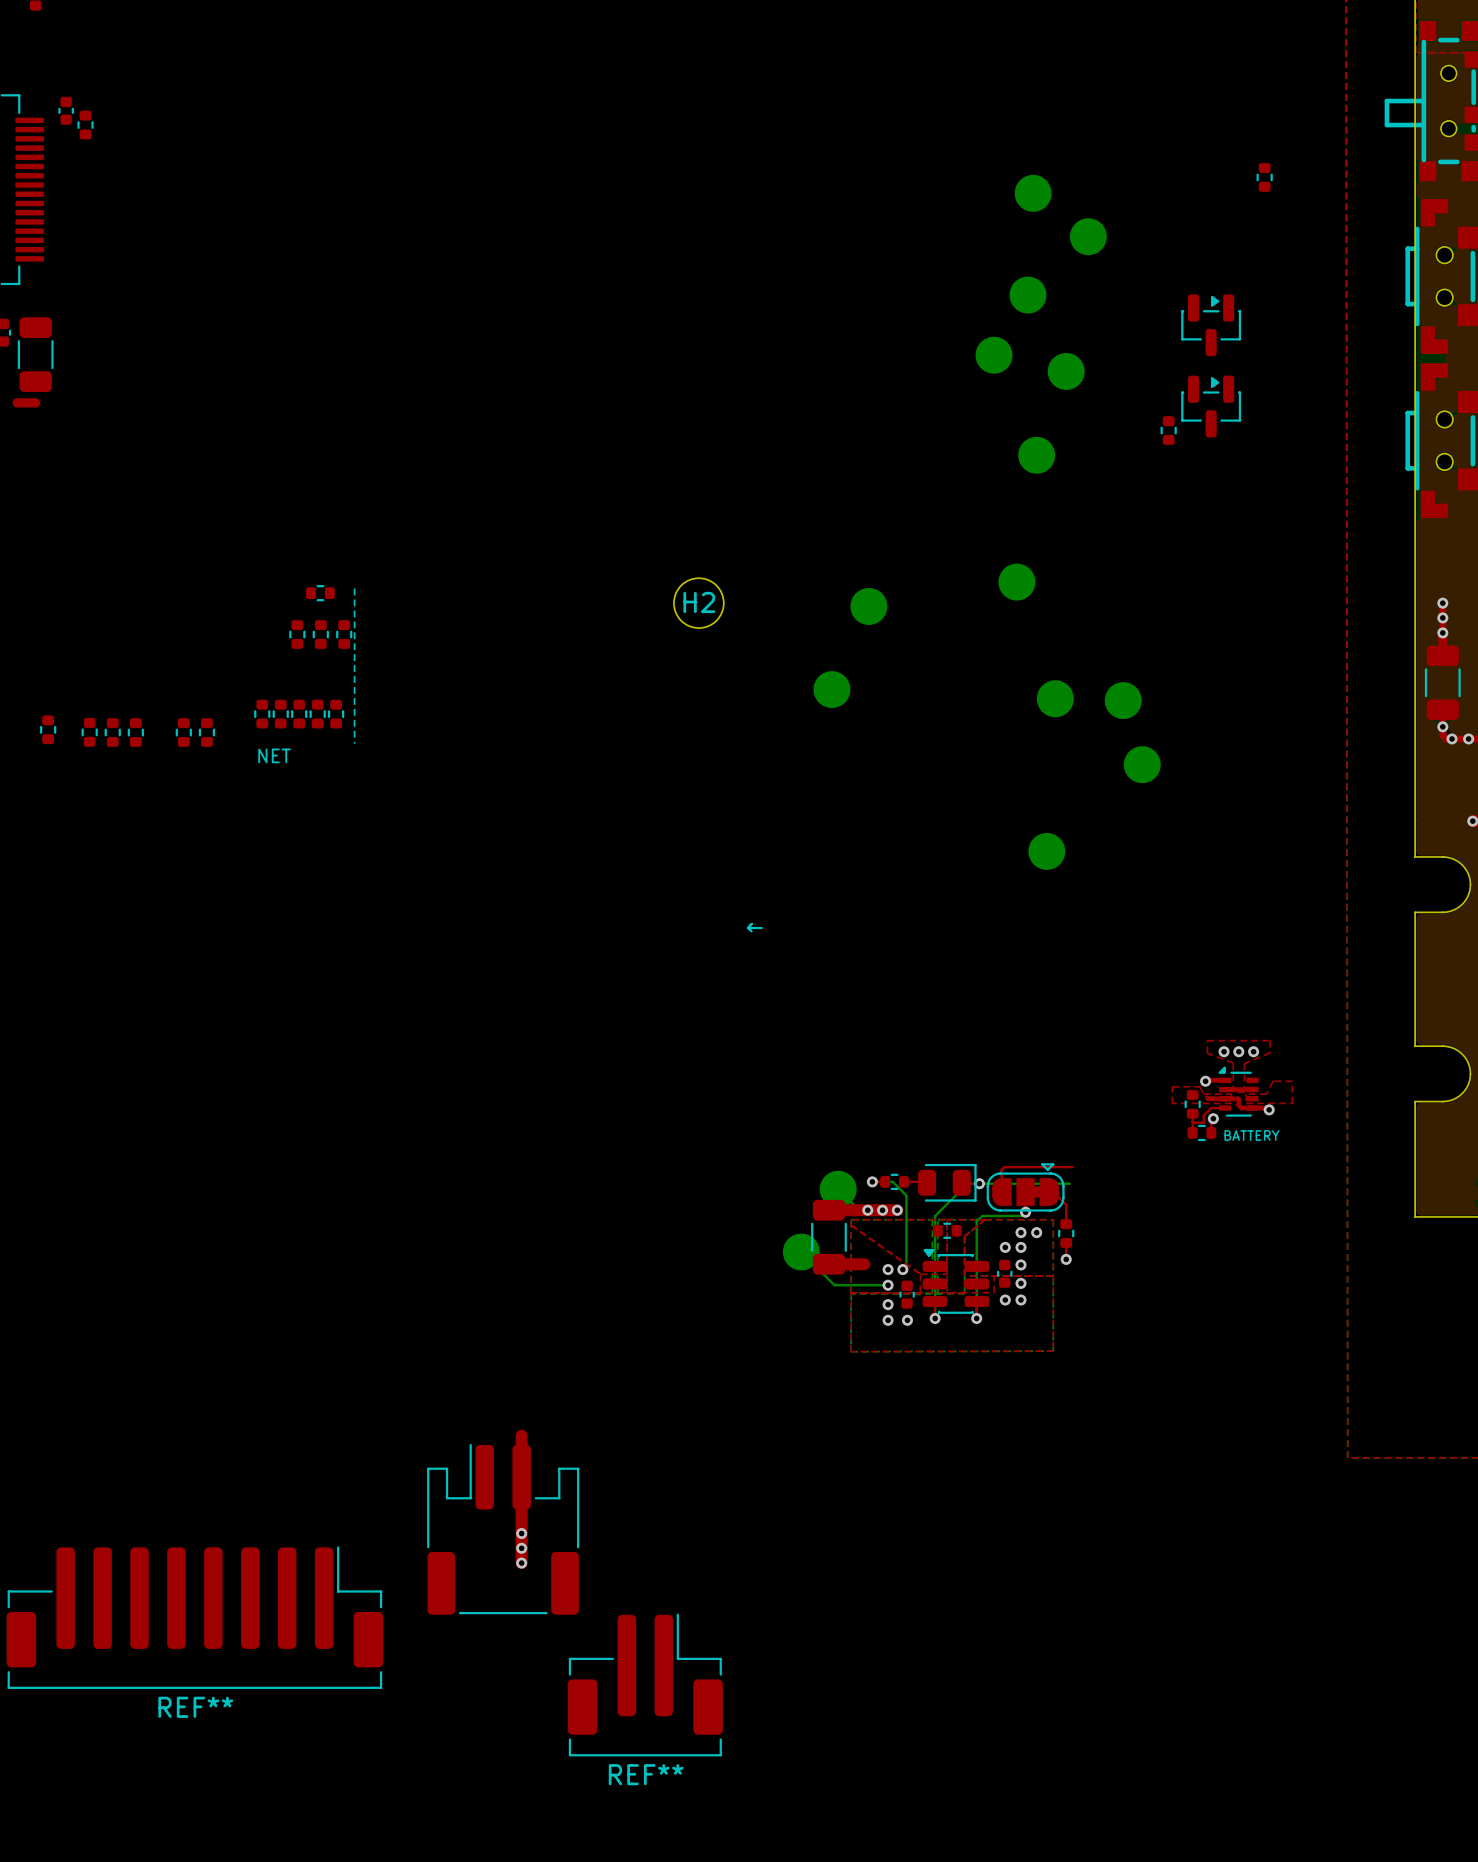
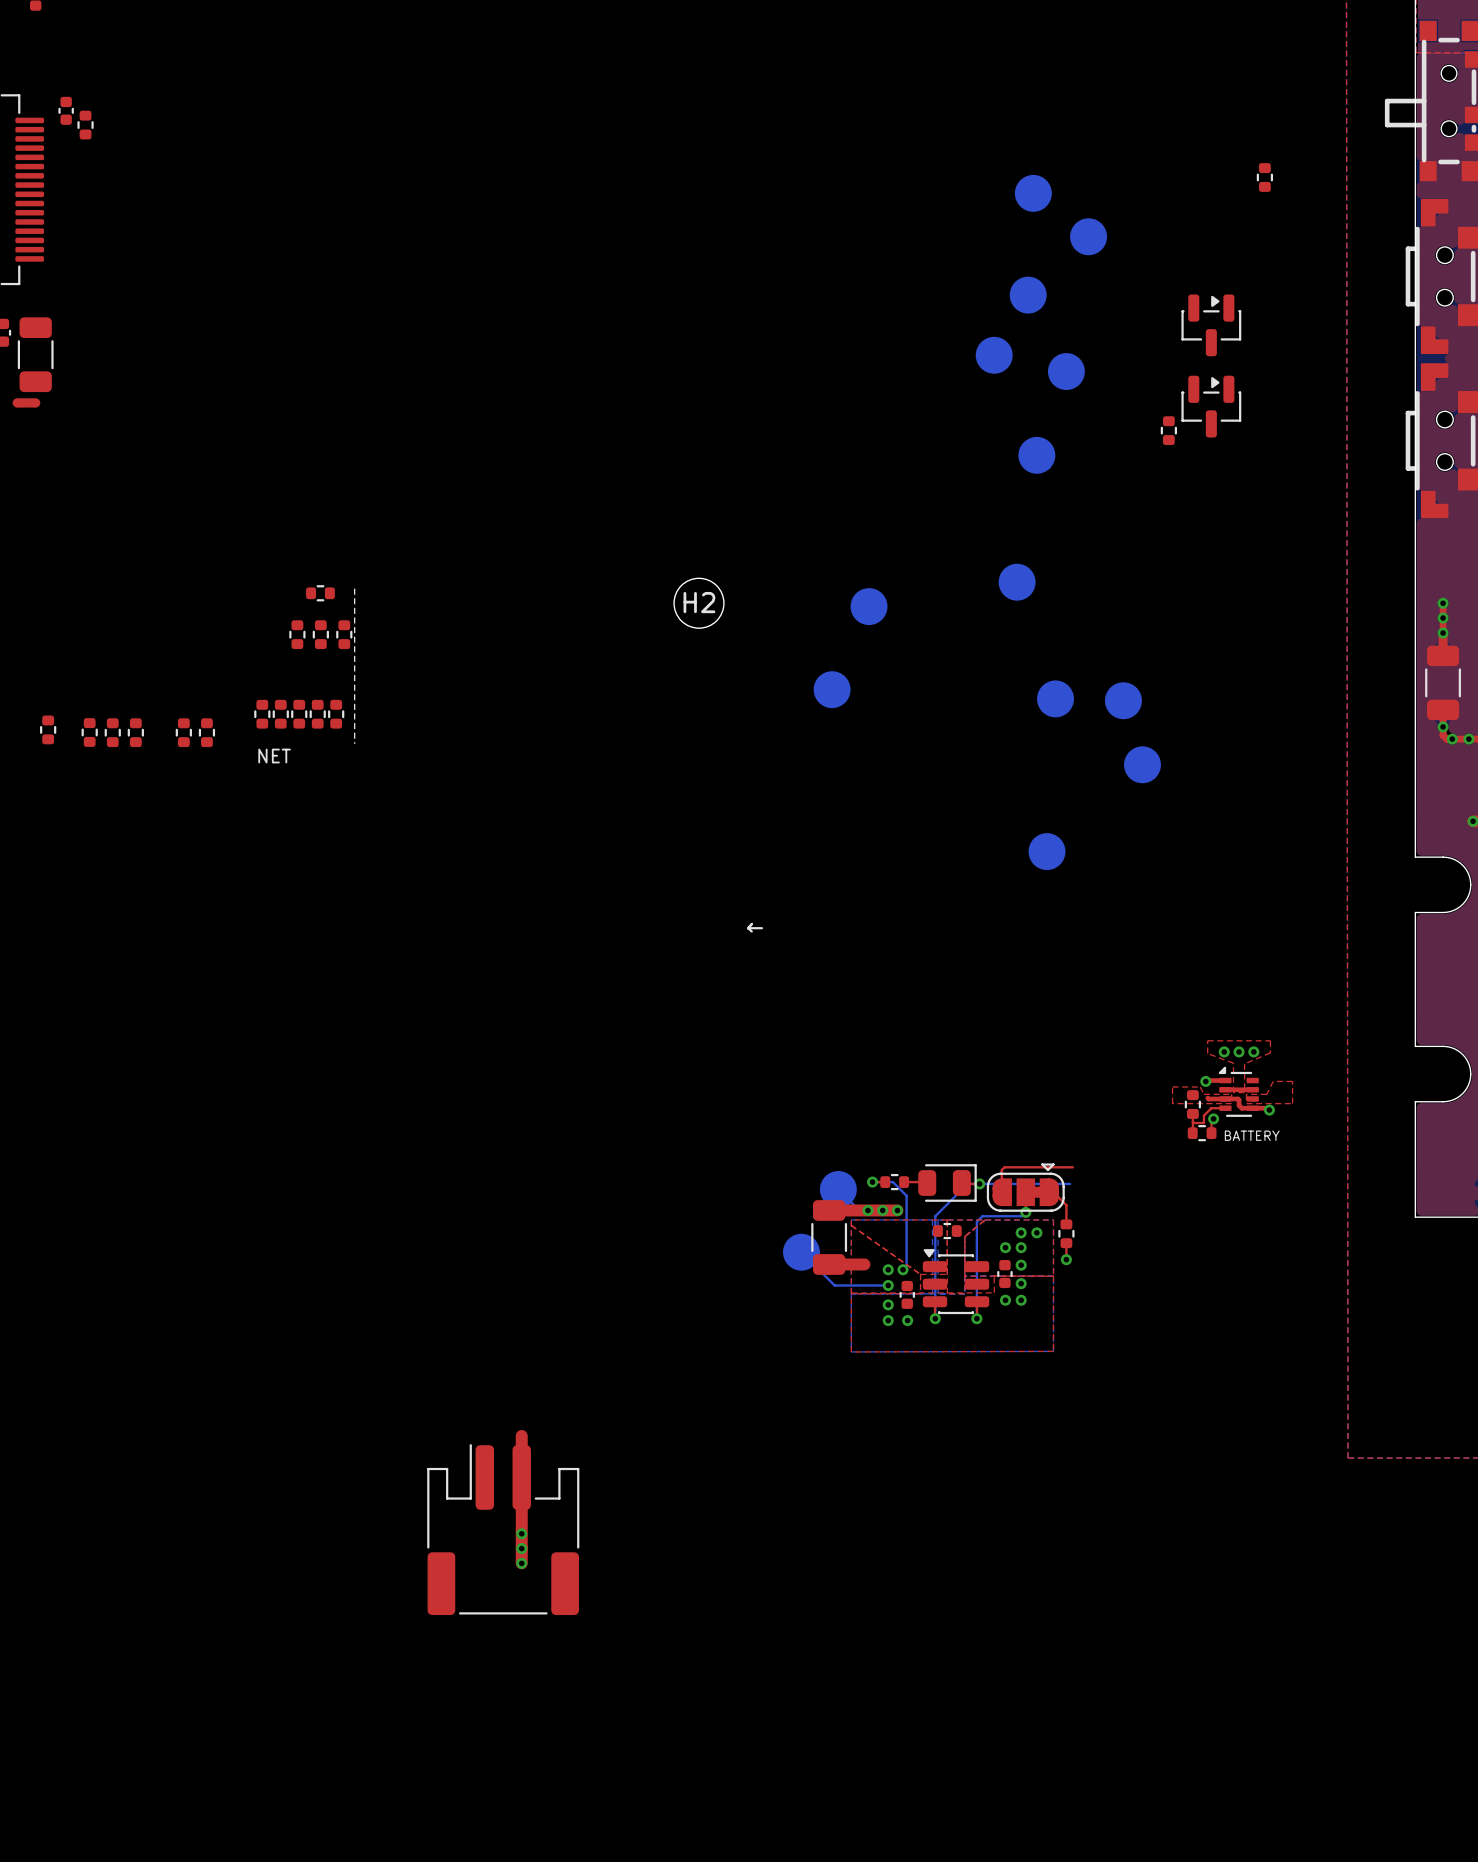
REF**: (194, 1617) -> none
REF**: (645, 1685) -> none

